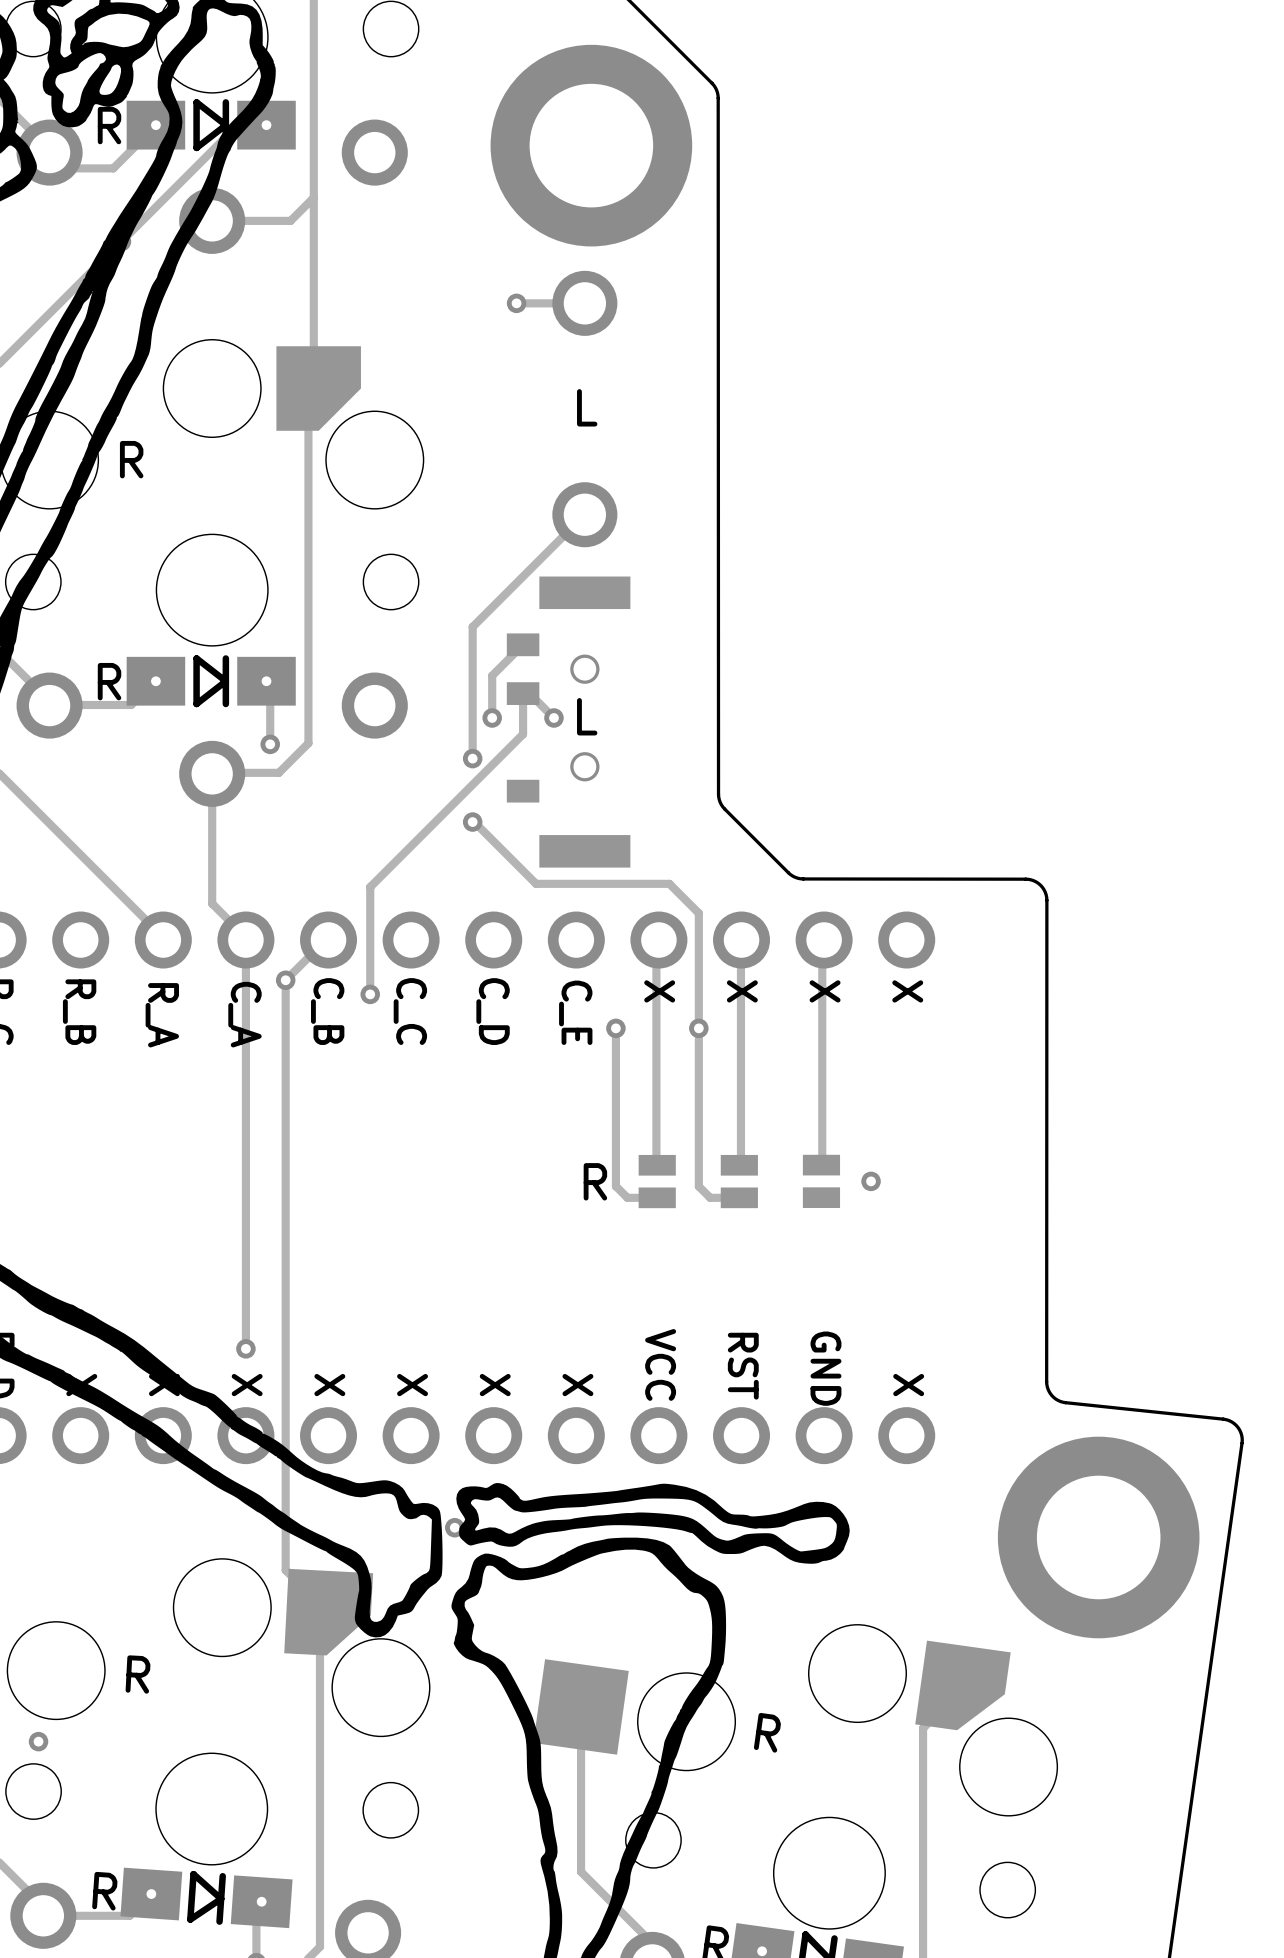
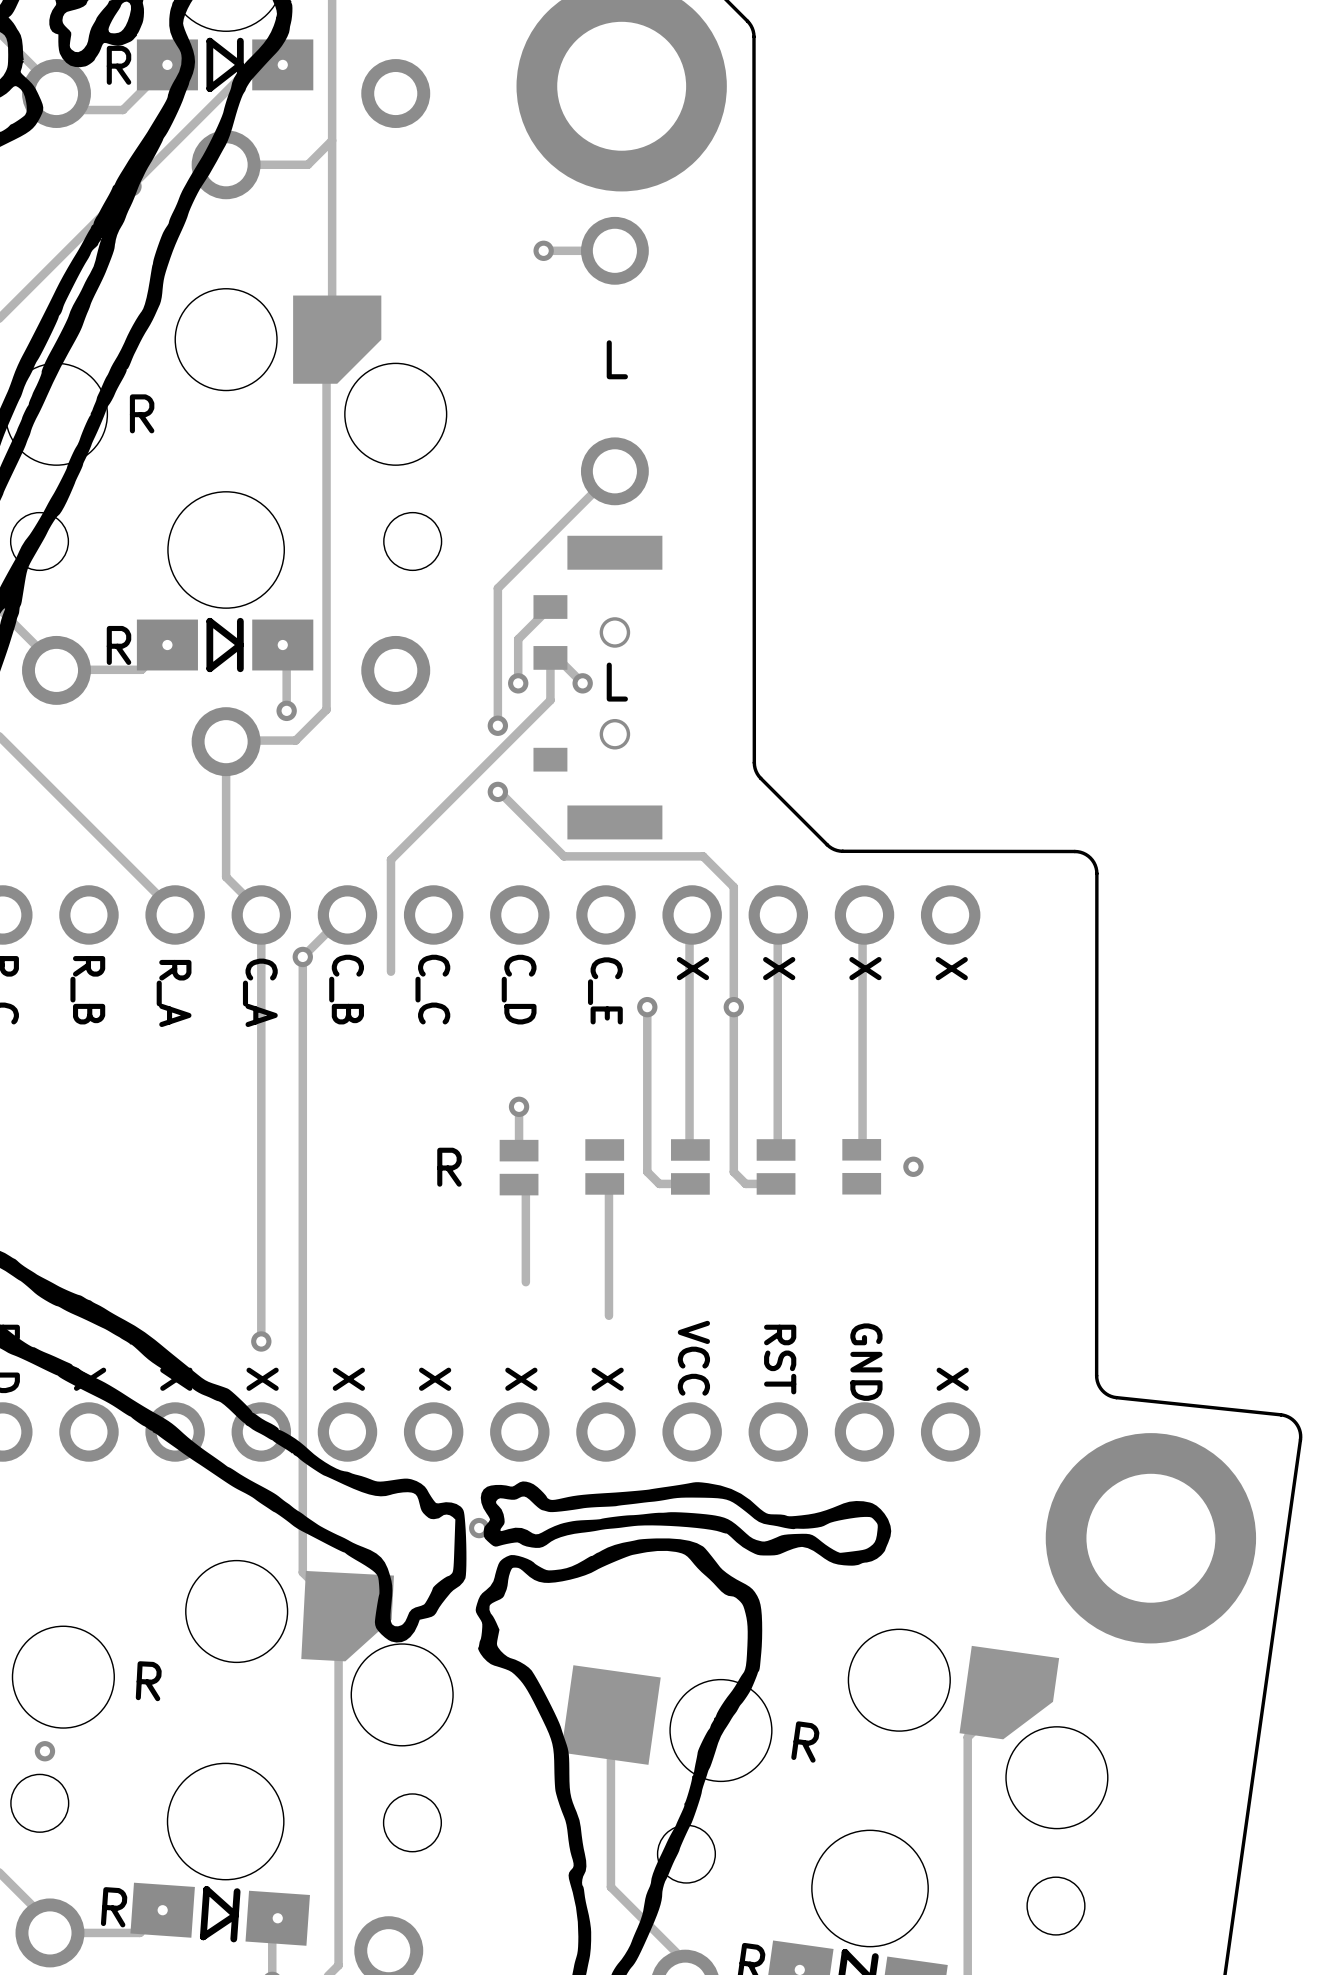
via position: (370, 994) -> (519, 1106)
track: none -> (519, 1106) (519, 1150)
part: none -> (604, 1166)
text position: R (595, 1181) -> R (449, 1167)
part: none -> (519, 1167)
track: none -> (519, 1184) (525, 1191) (525, 1282)
track: none -> (608, 1188) (608, 1315)

